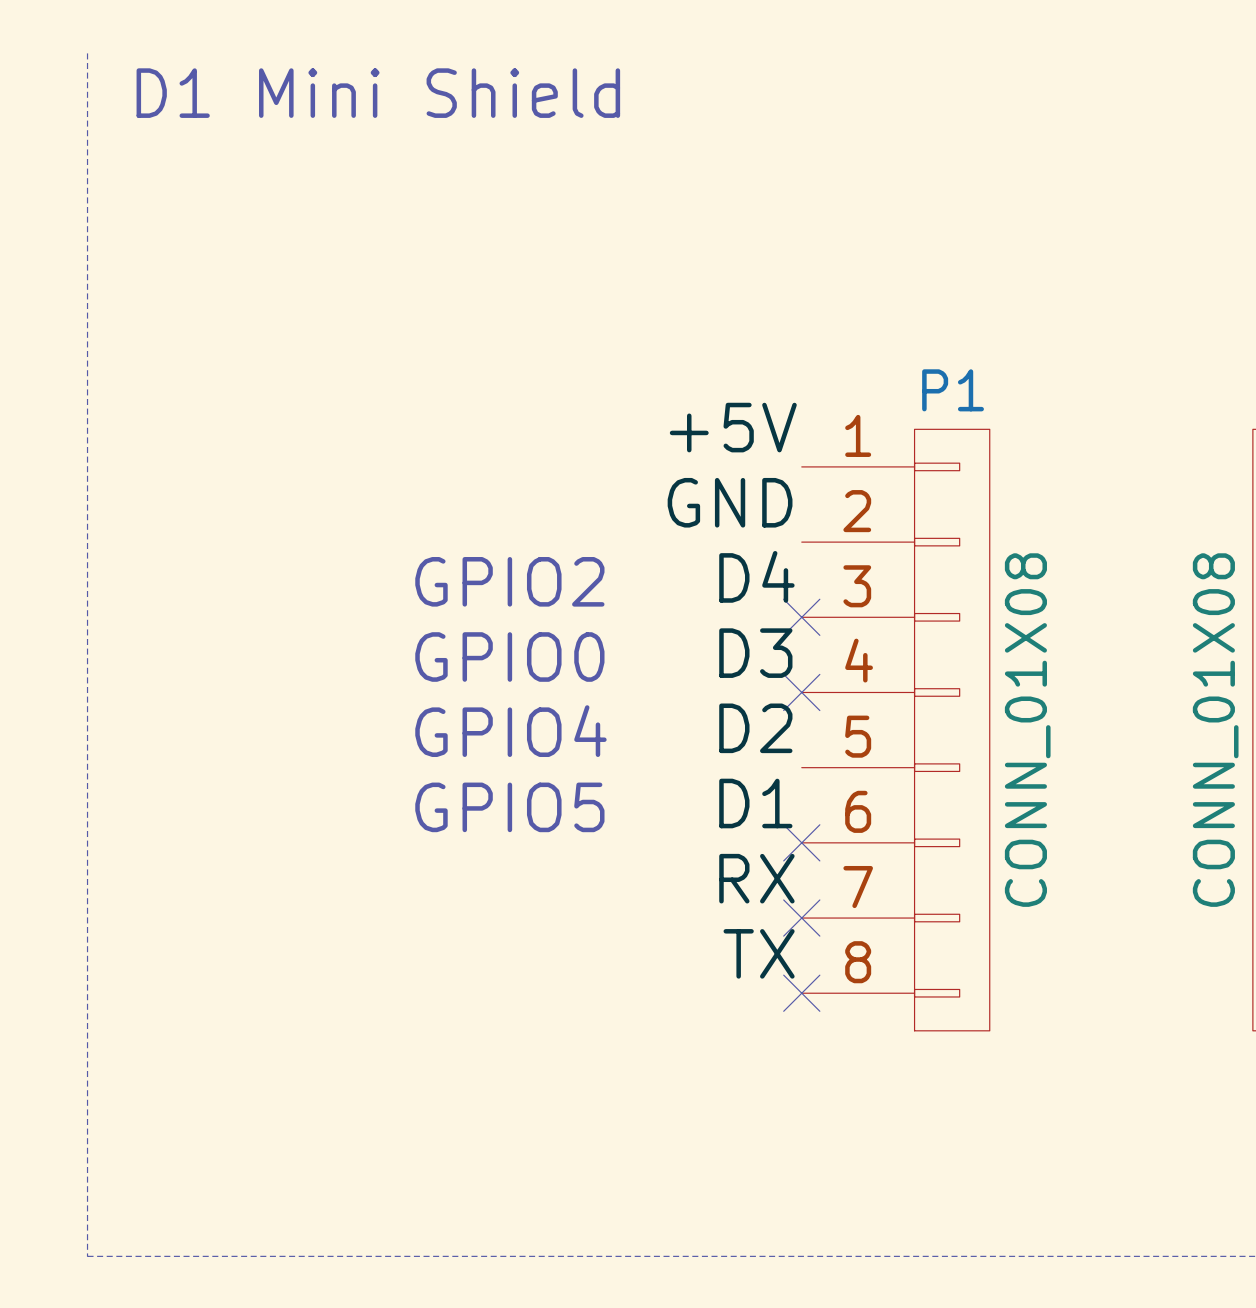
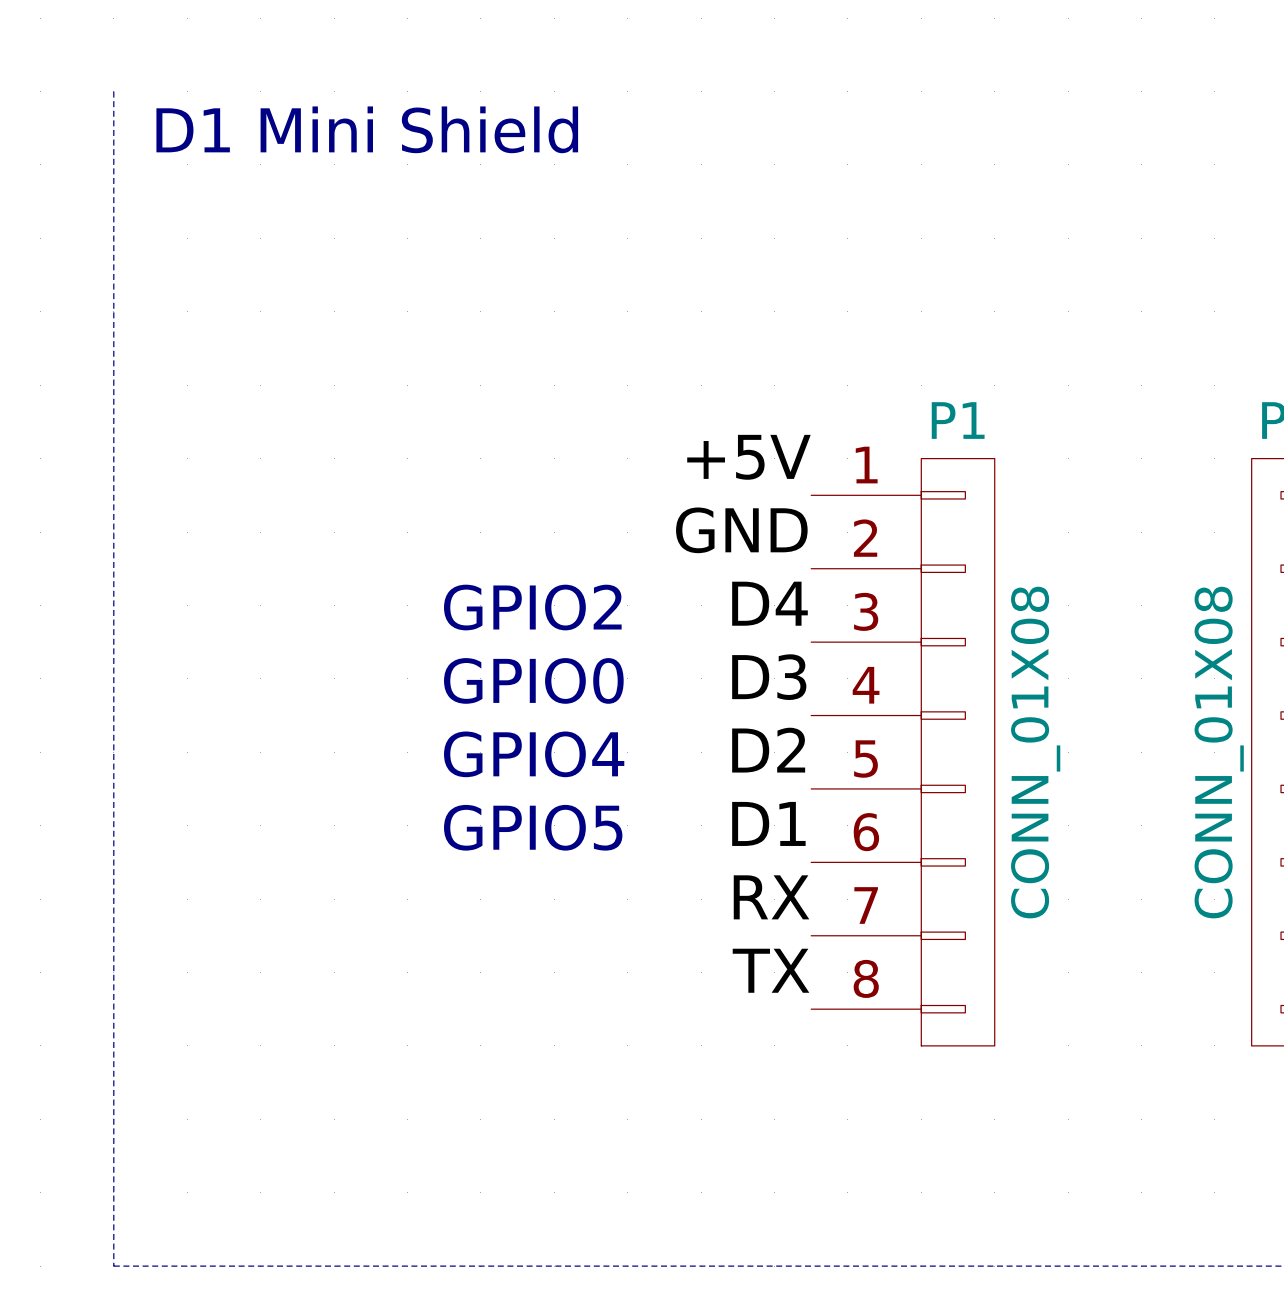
no-connect mark: (801, 617) -> none
no-connect mark: (801, 692) -> none
no-connect mark: (801, 842) -> none
no-connect mark: (801, 918) -> none
no-connect mark: (801, 993) -> none

